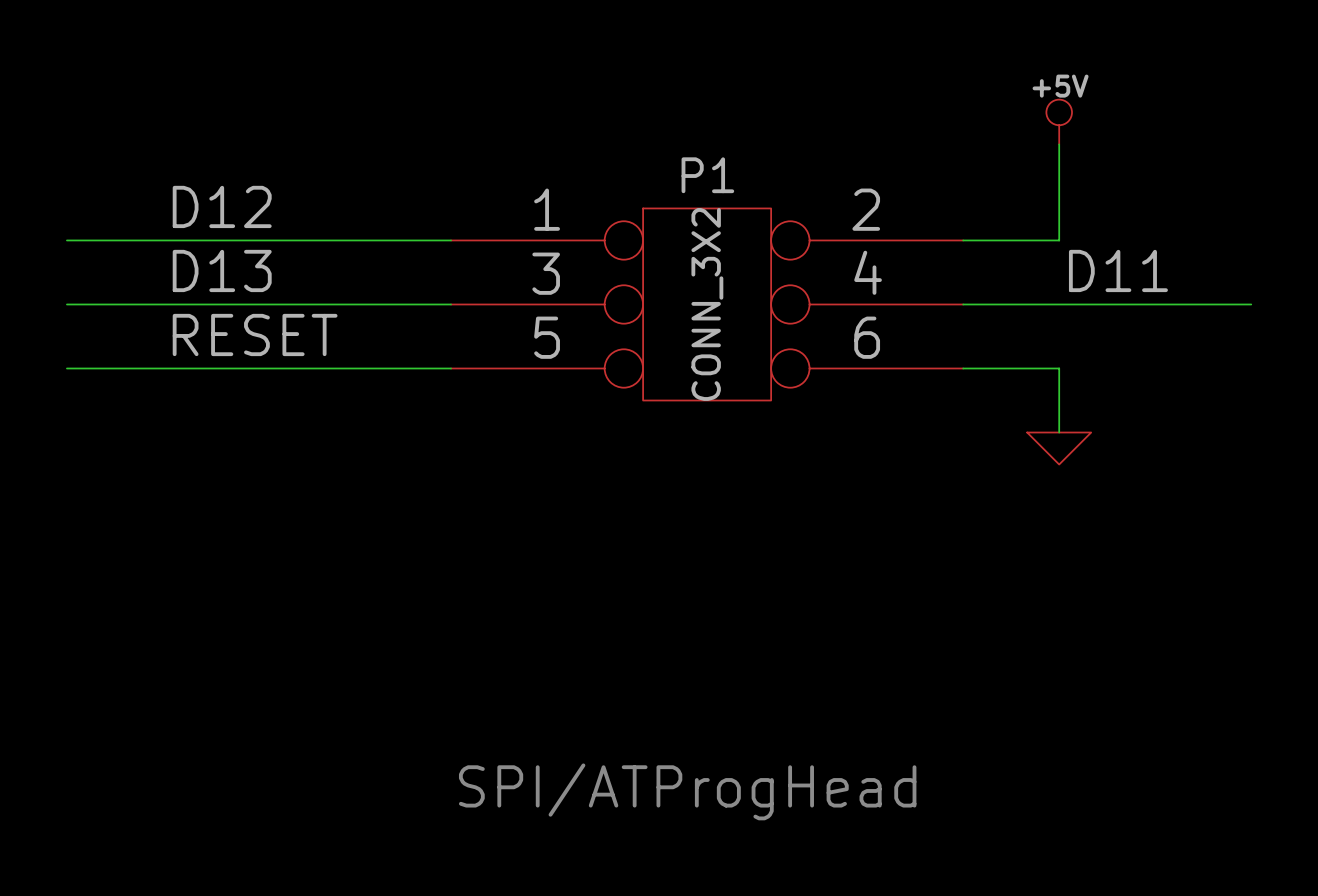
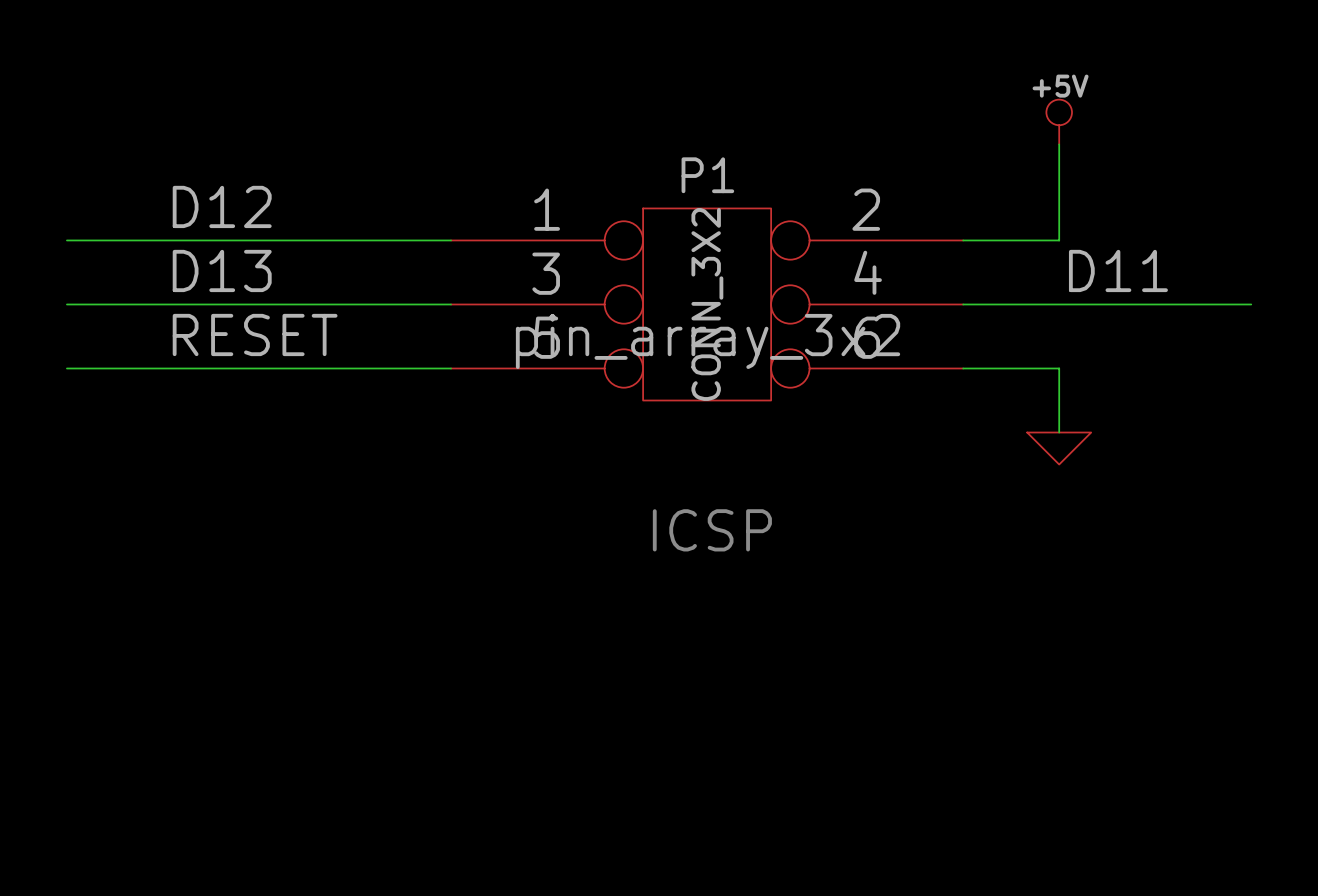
P1 text: none -> pin_array_3x2 (708, 341)
text: none -> ICSP (712, 530)
text: SPI/ATProgHead (687, 791) -> none

